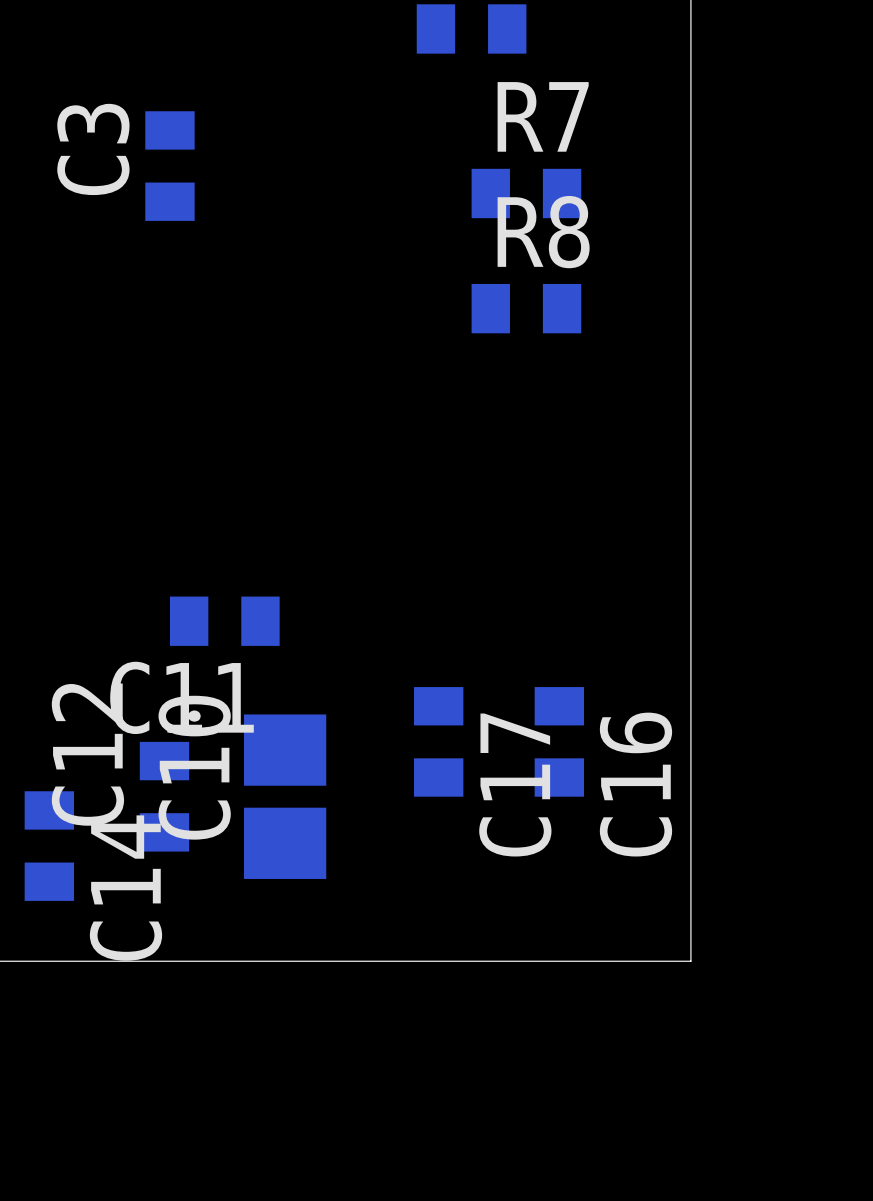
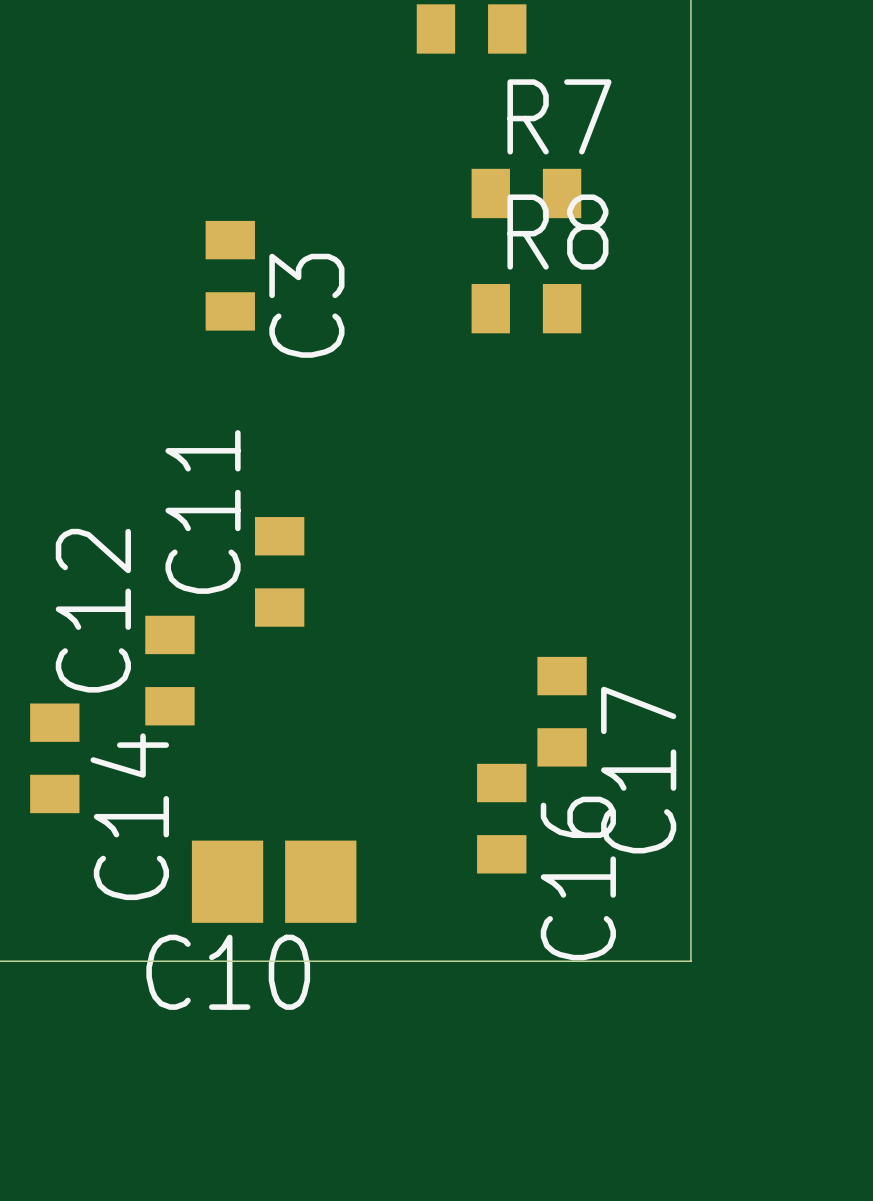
C3 name position: C3 (93, 149) -> C3 (306, 305)
C3 position: (169, 166) -> (230, 275)
C11 rotation: 0° (224, 621) -> 90° clockwise (279, 571)
C11 position: (224, 621) -> (279, 571)
C17 position: (438, 741) -> (562, 711)
C16 position: (559, 741) -> (501, 818)
C10 name position: C10 (194, 767) -> C10 (228, 972)
C12 position: (164, 796) -> (169, 670)
C10 rotation: 0° (285, 796) -> 90° clockwise (274, 881)
C14 position: (49, 846) -> (54, 758)

